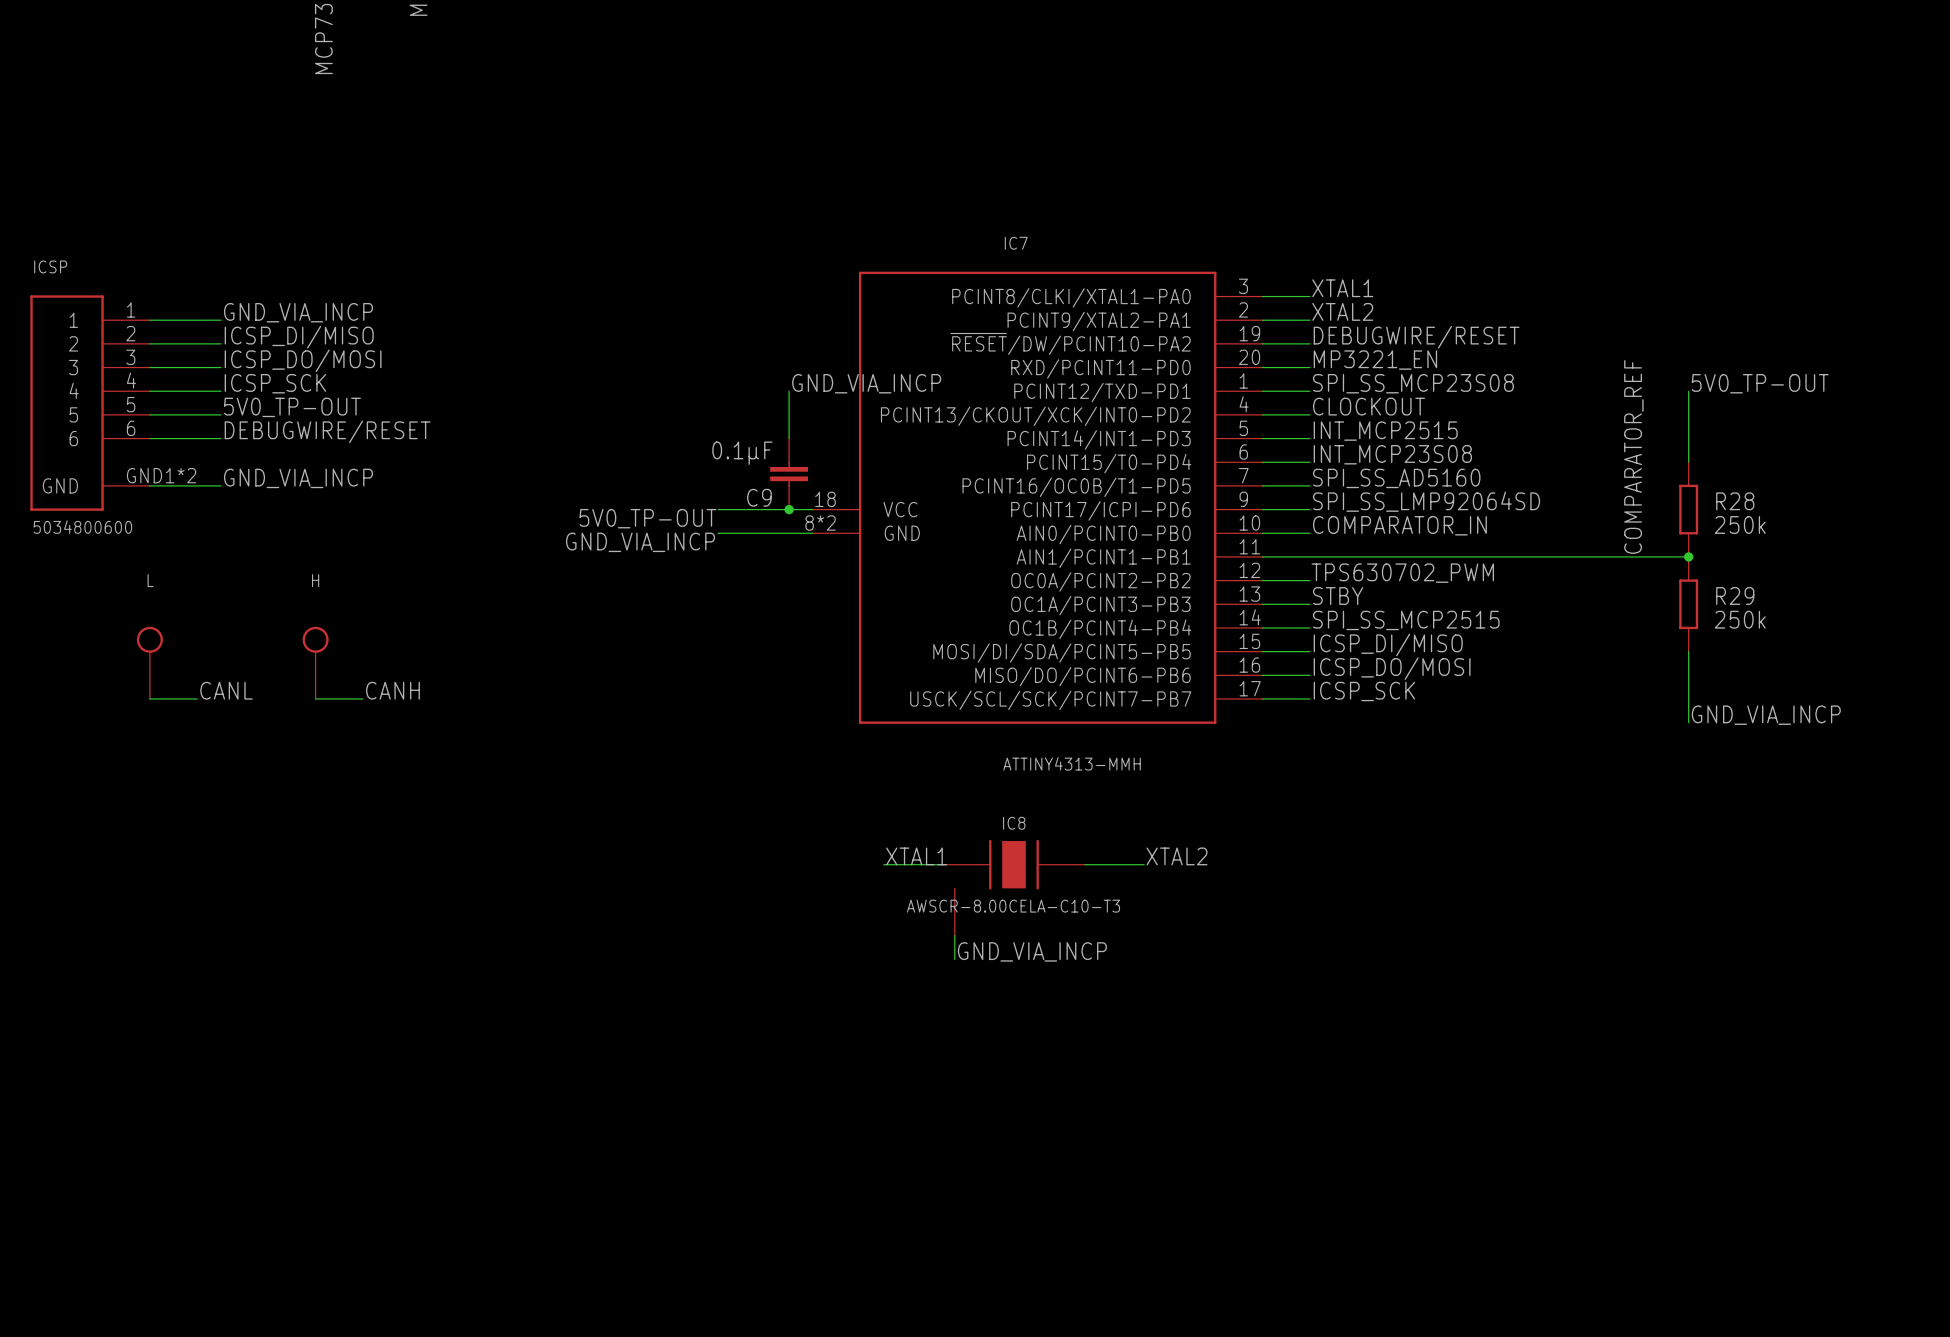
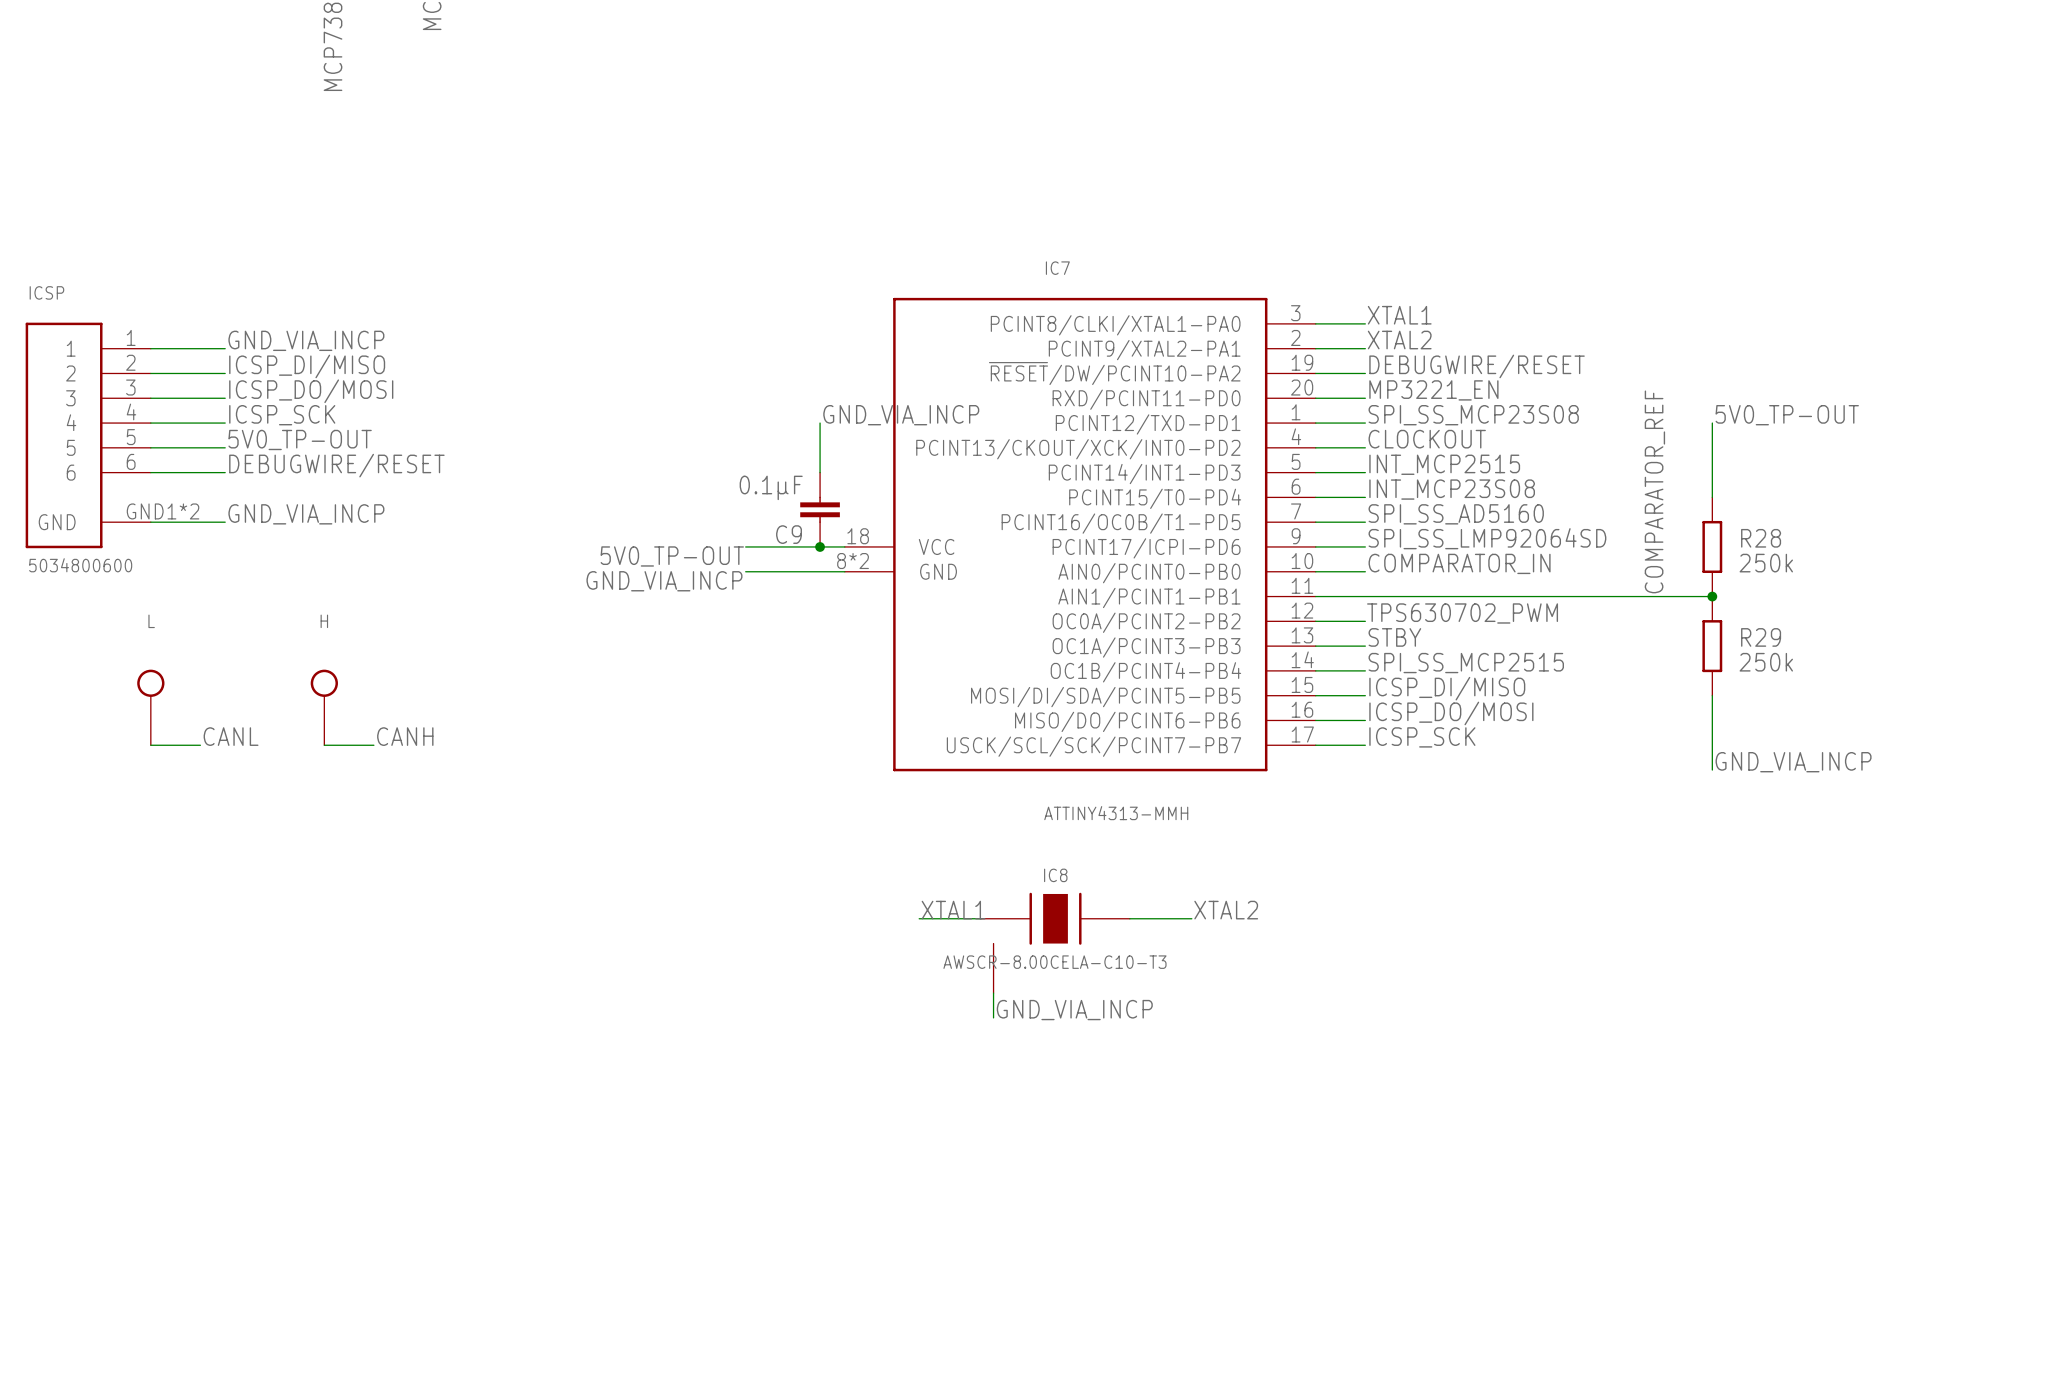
label position: 5V0_TP-OUT (1760, 383) -> 5V0_TP-OUT (1787, 415)
wire: (1688, 391) (1688, 462) -> (1712, 423) (1712, 497)
label position: COMPARATOR_REF (1633, 457) -> COMPARATOR_REF (1654, 491)
R28 position: (1688, 509) -> (1712, 546)
wire: (1641, 556) (1688, 556) -> none
junction position: (1688, 556) -> (1712, 596)
R29 position: (1688, 604) -> (1712, 646)
wire: (1688, 651) (1688, 722) -> (1712, 695) (1712, 770)
label position: GND_VIA_INCP (1766, 715) -> GND_VIA_INCP (1793, 762)

